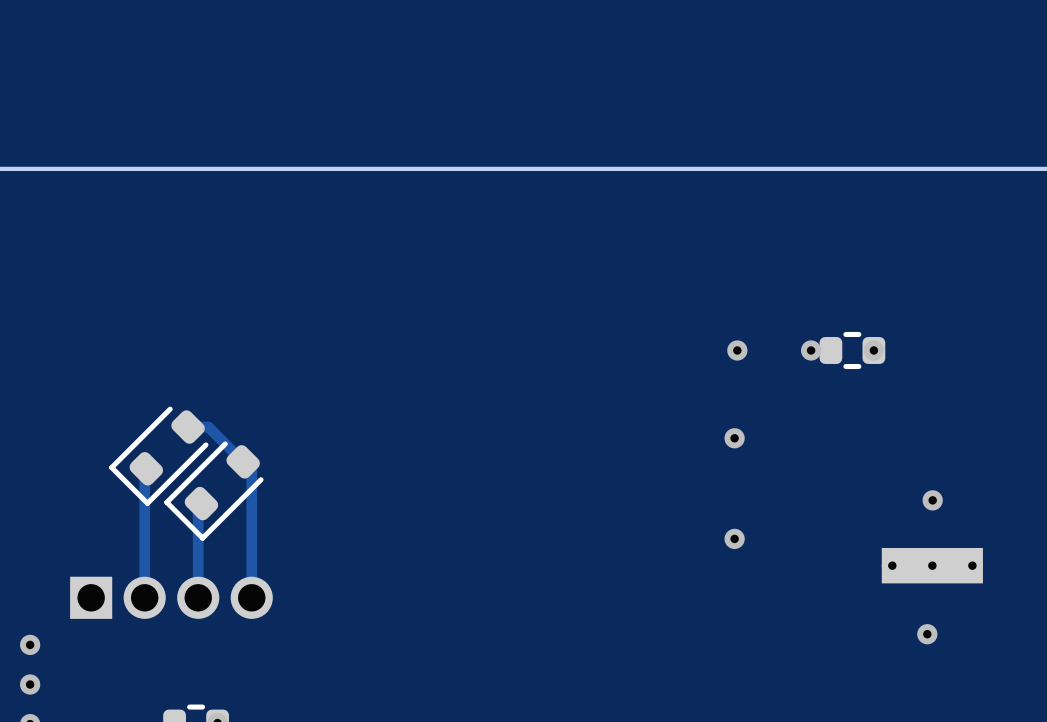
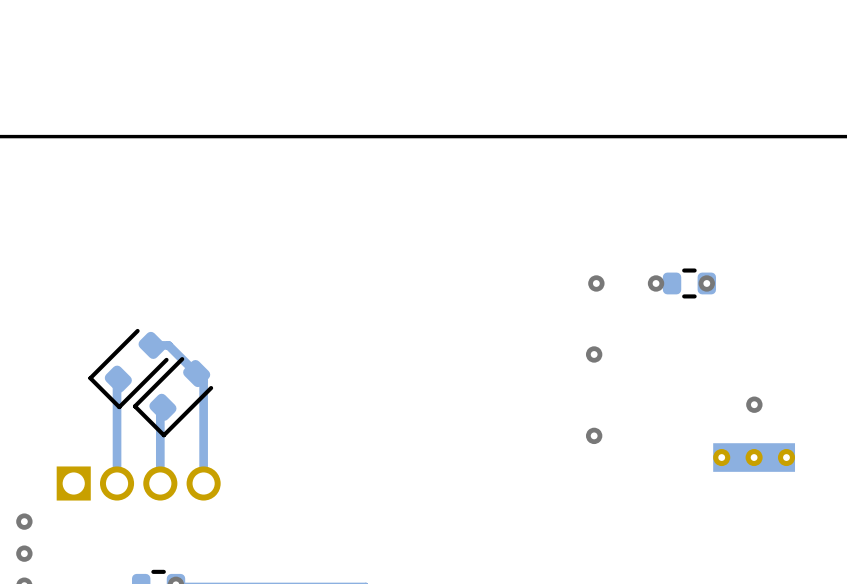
via: (927, 634) -> none

